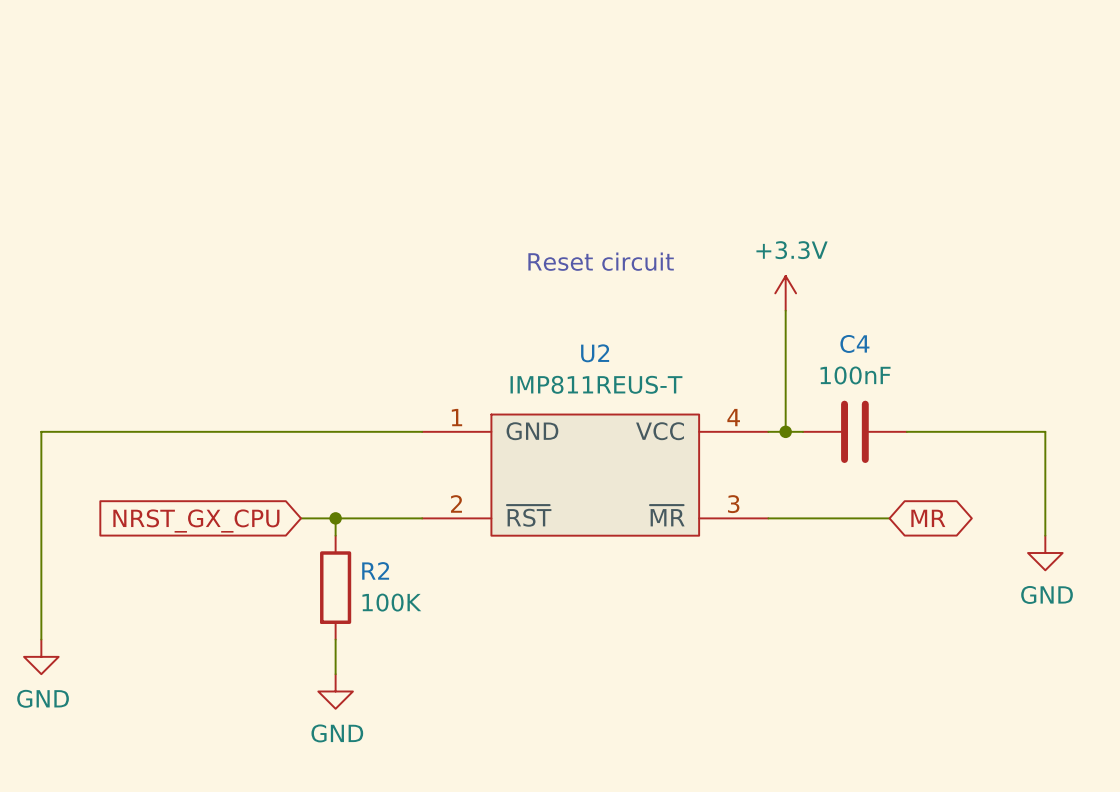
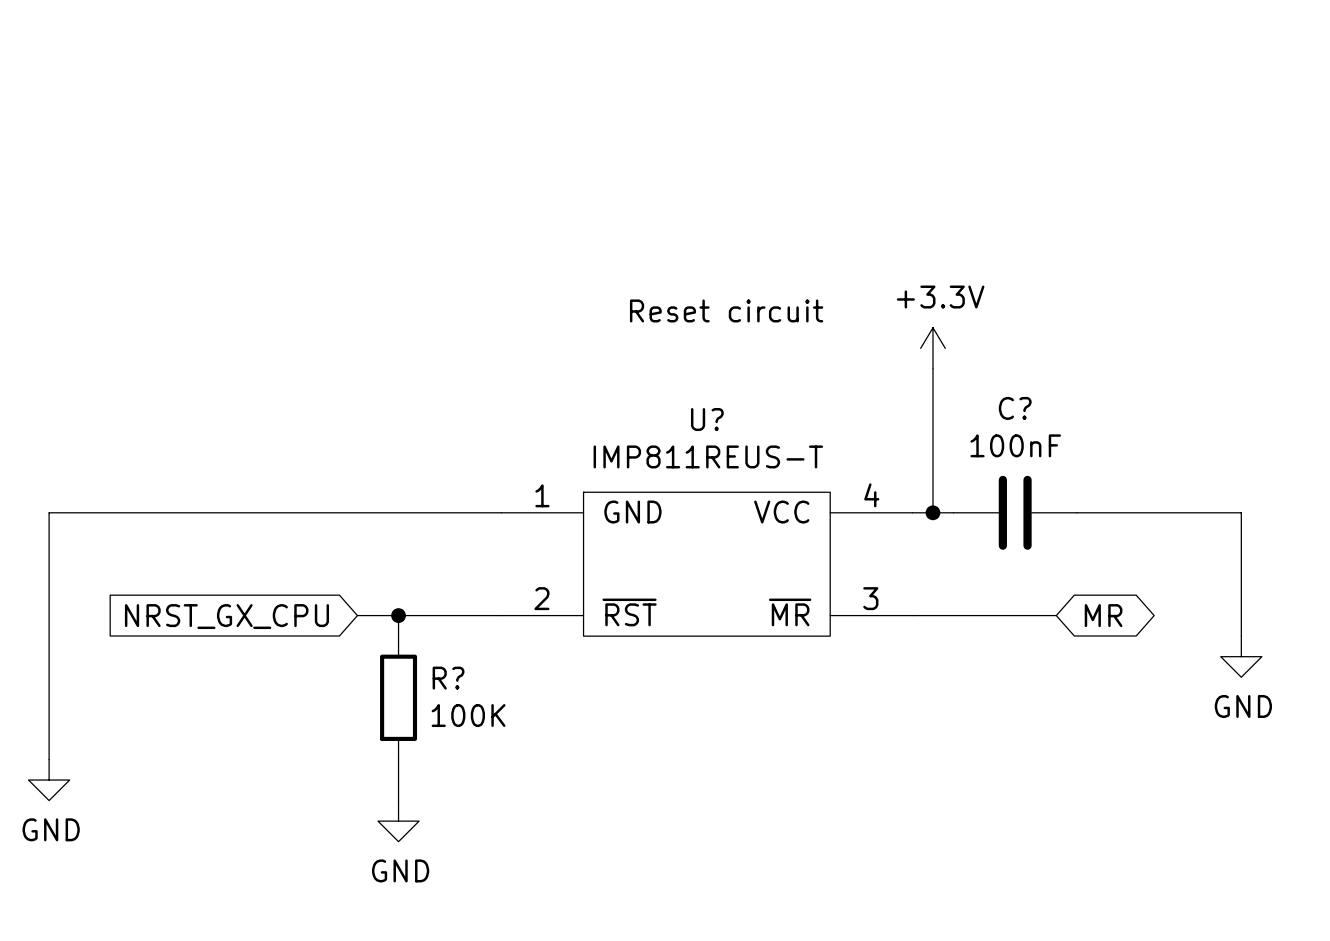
C4 name: C4 (854, 343) -> C? (1015, 408)
U2 name: U2 (595, 353) -> U? (707, 419)
R2 name: R2 (375, 570) -> R? (448, 678)

